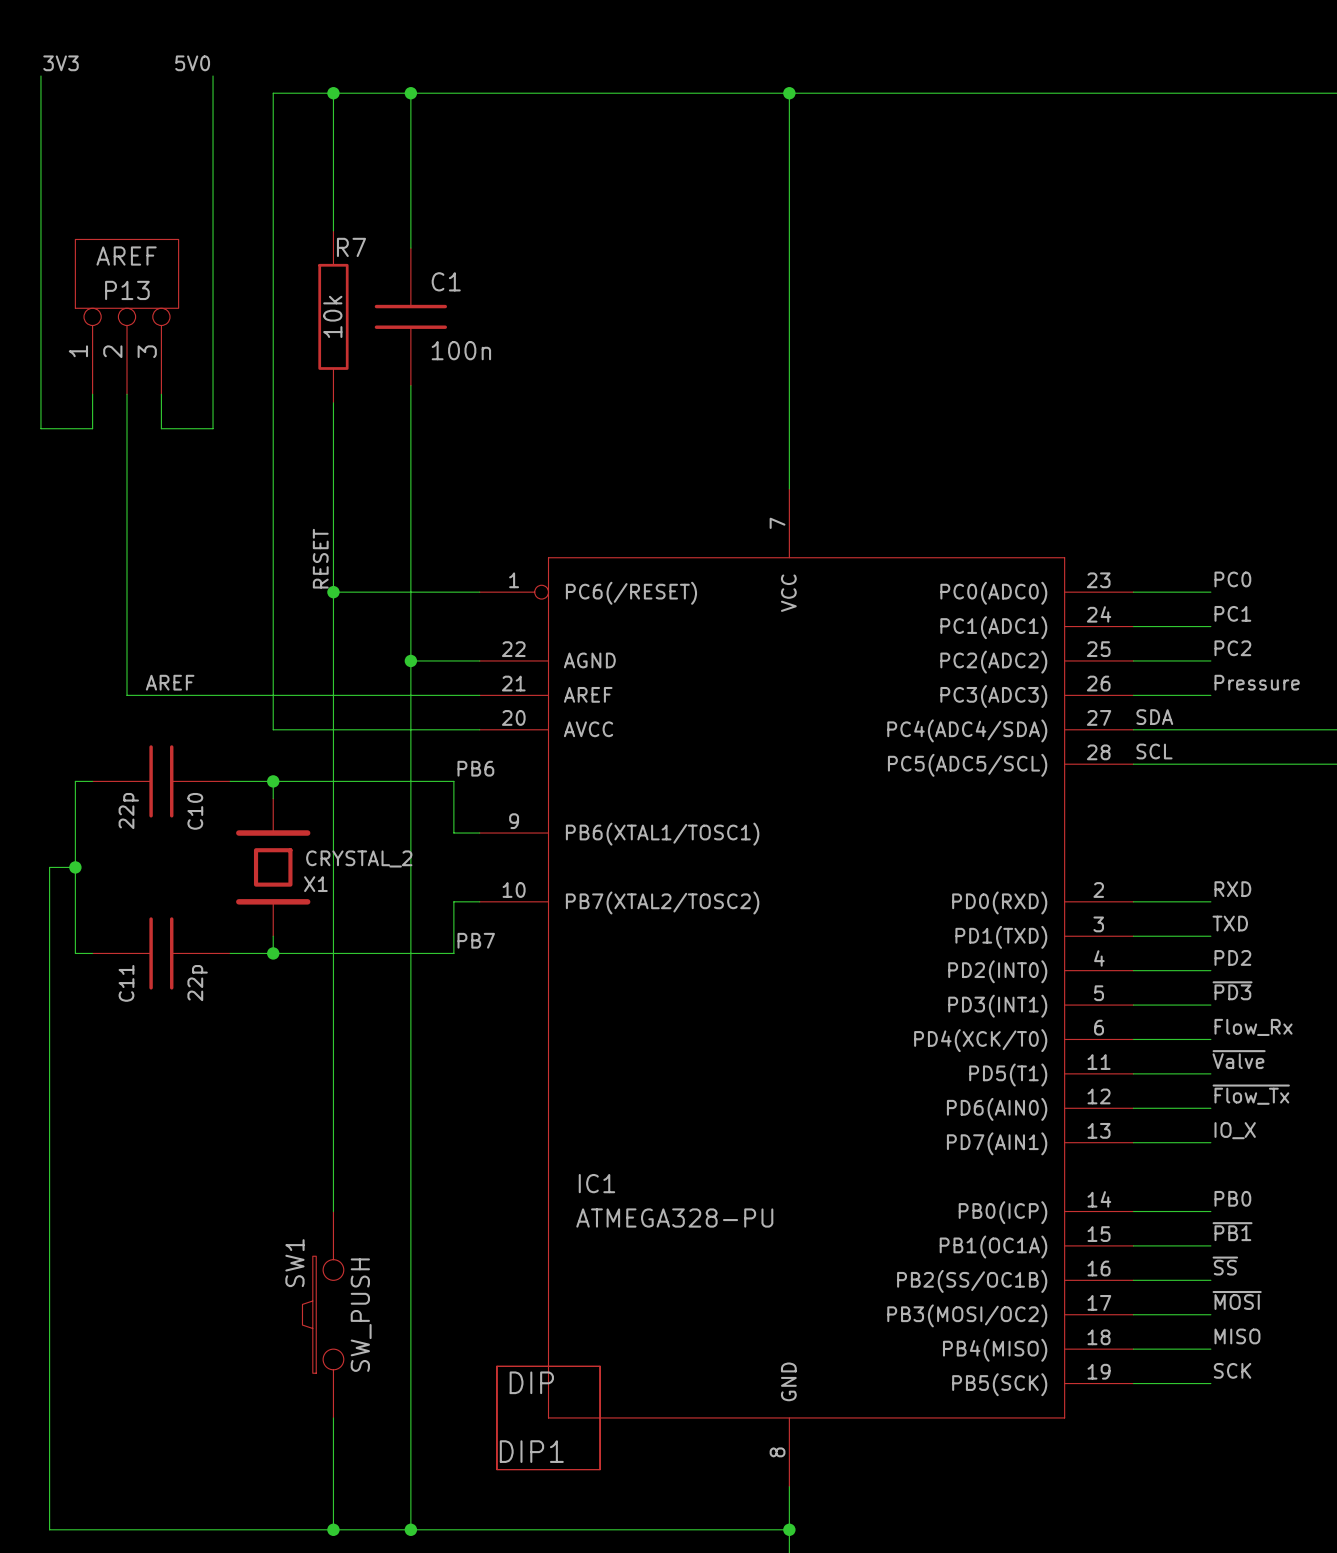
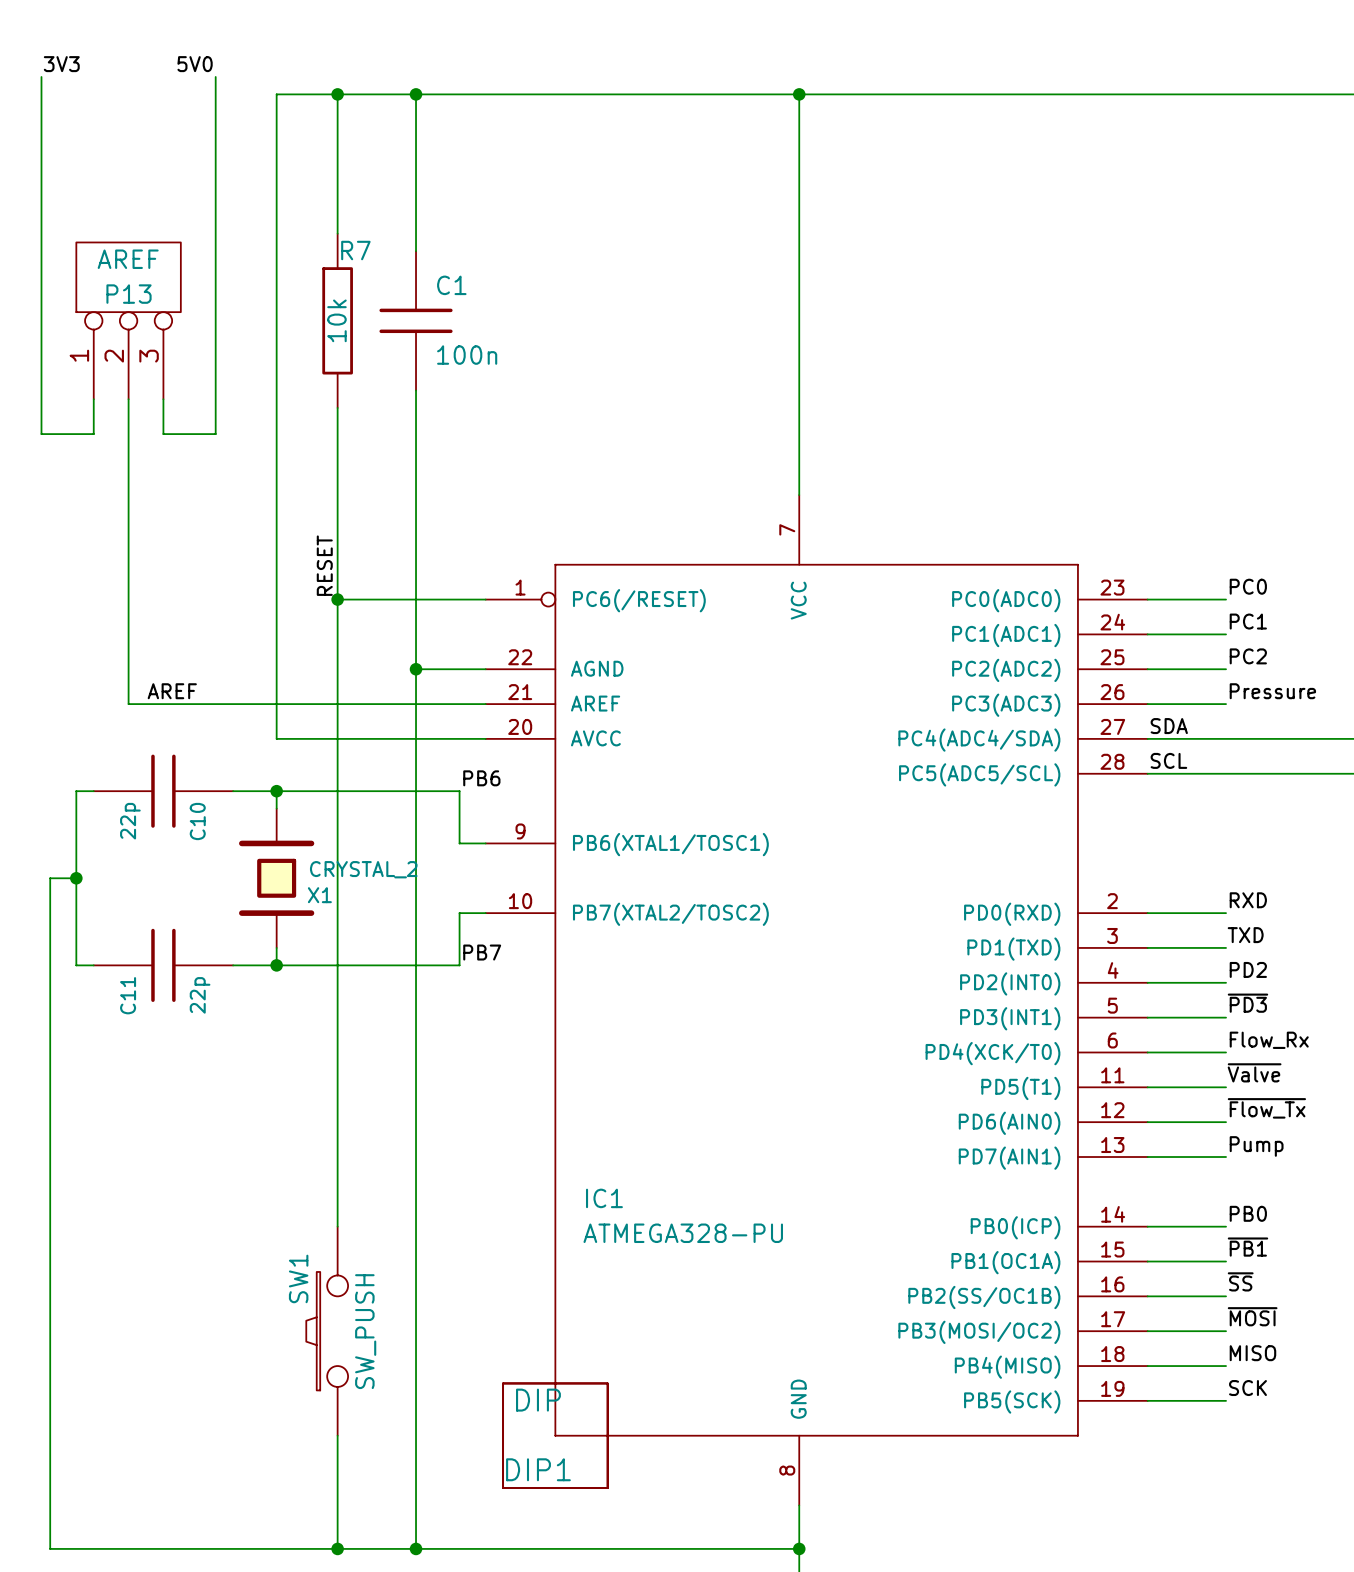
label: IO_X (1235, 1130) -> Pump (1256, 1146)

